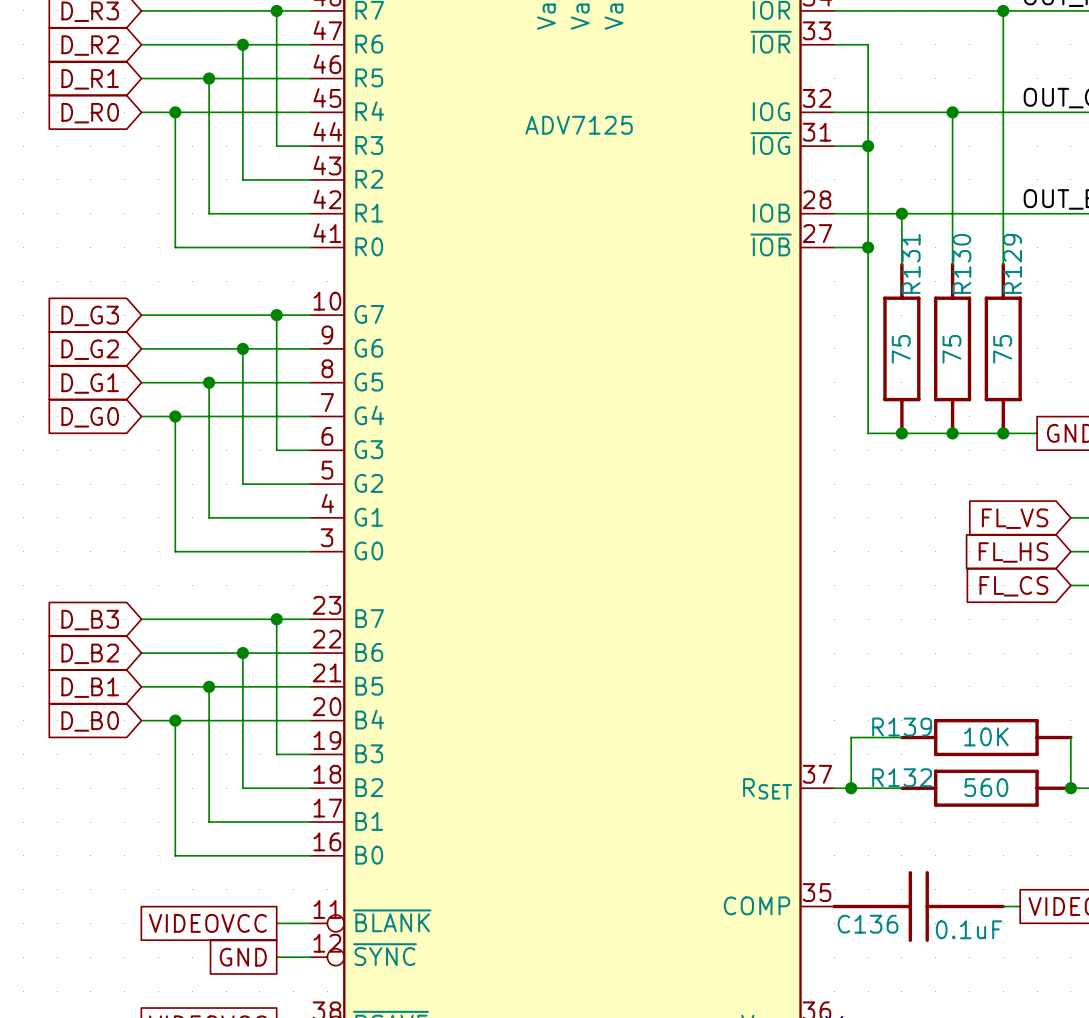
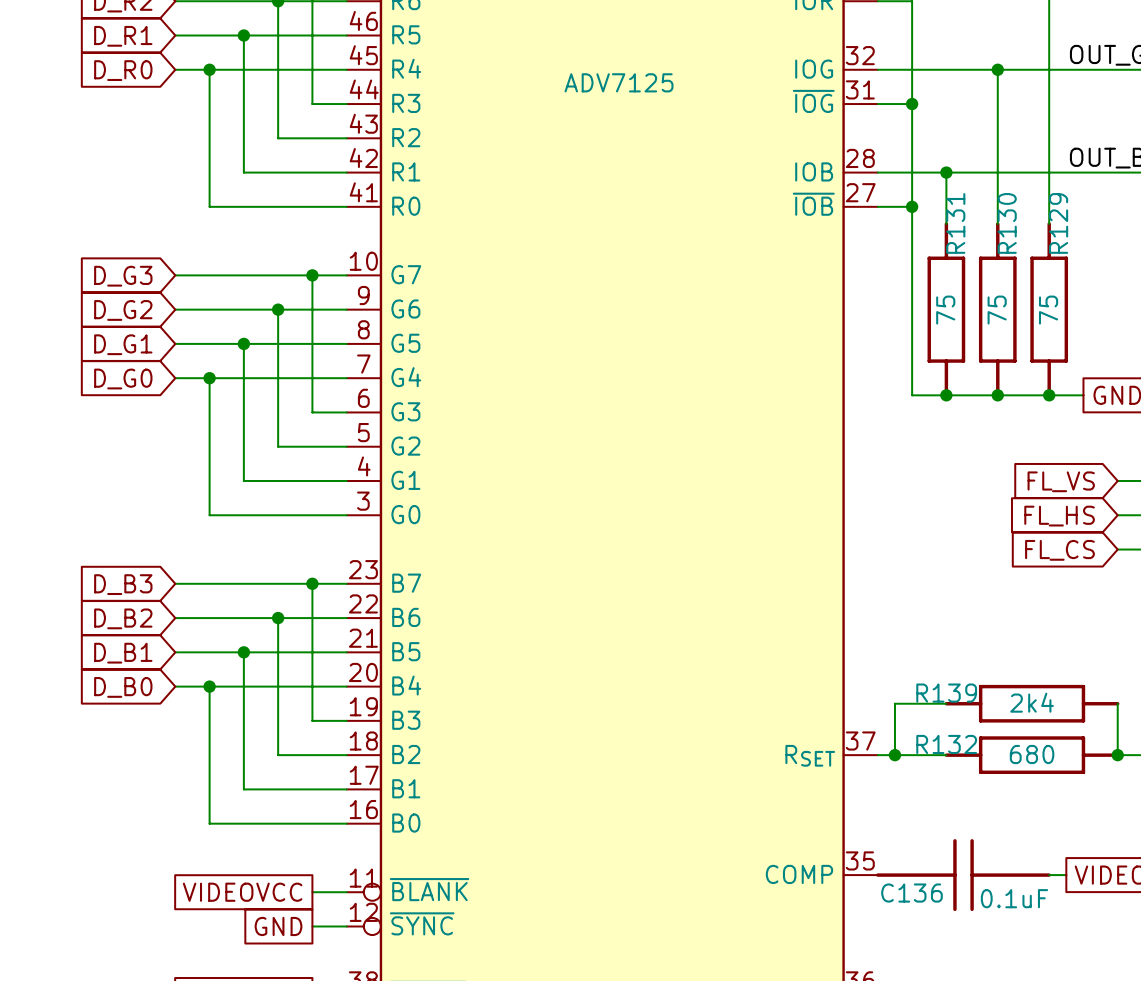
R139 value: 10K (986, 736) -> 2k4 (1032, 702)
R132 value: 560 (986, 787) -> 680 (1032, 754)

